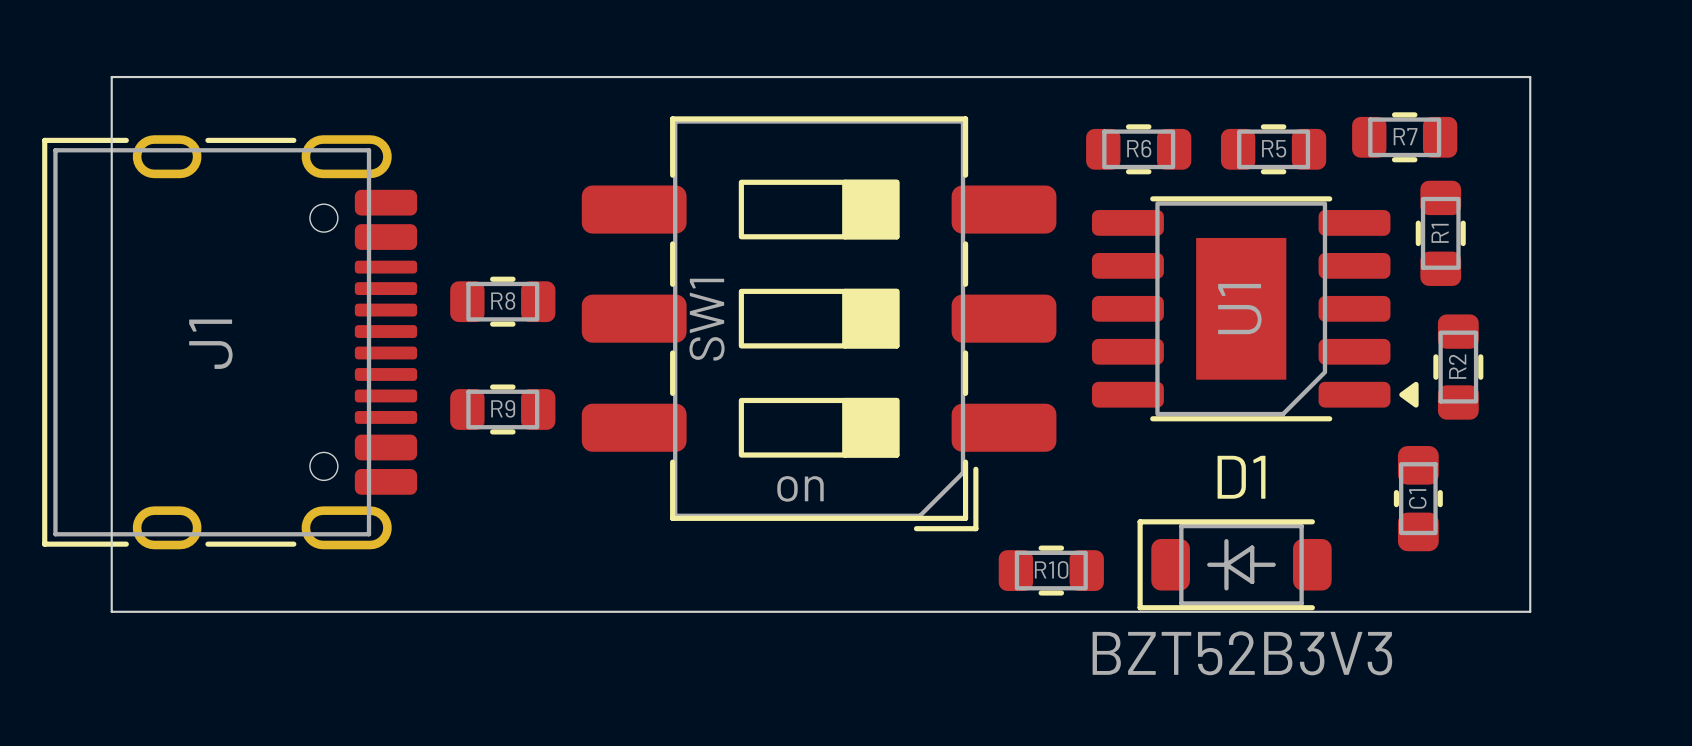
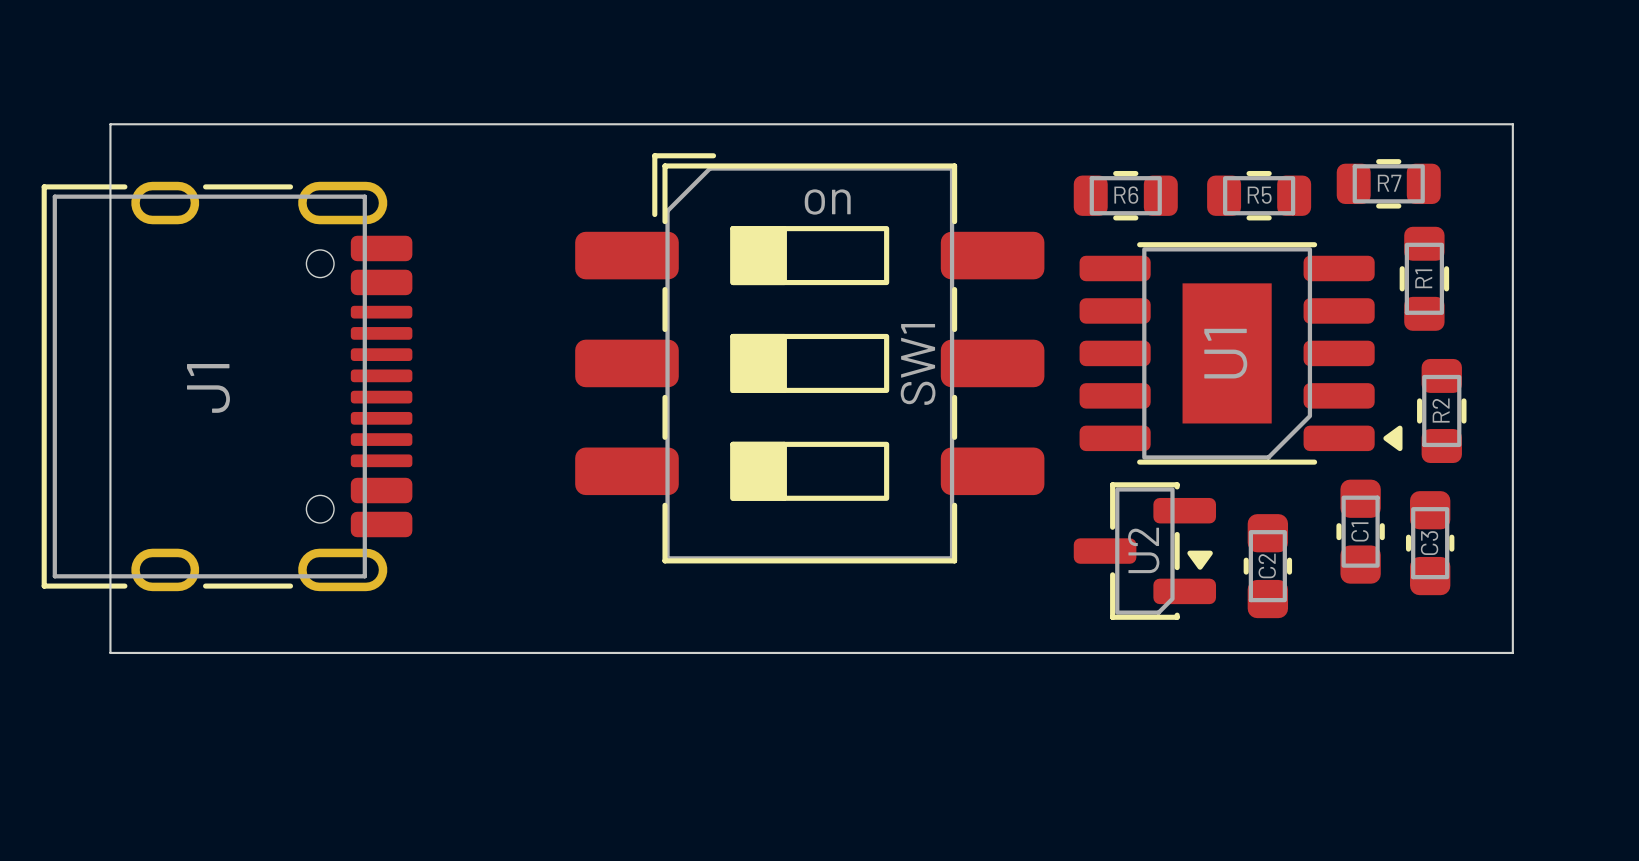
R8: (502, 301) -> none
SW1 rotation: 0° (819, 323) -> 180° (809, 358)
R9: (502, 409) -> none
C1 position: (1418, 498) -> (1360, 531)
C3: none -> (1430, 543)
U2: none -> (1144, 551)
C2: none -> (1267, 566)
D1: BZT52B3V3 (1234, 564) -> none
R10: (1051, 570) -> none

